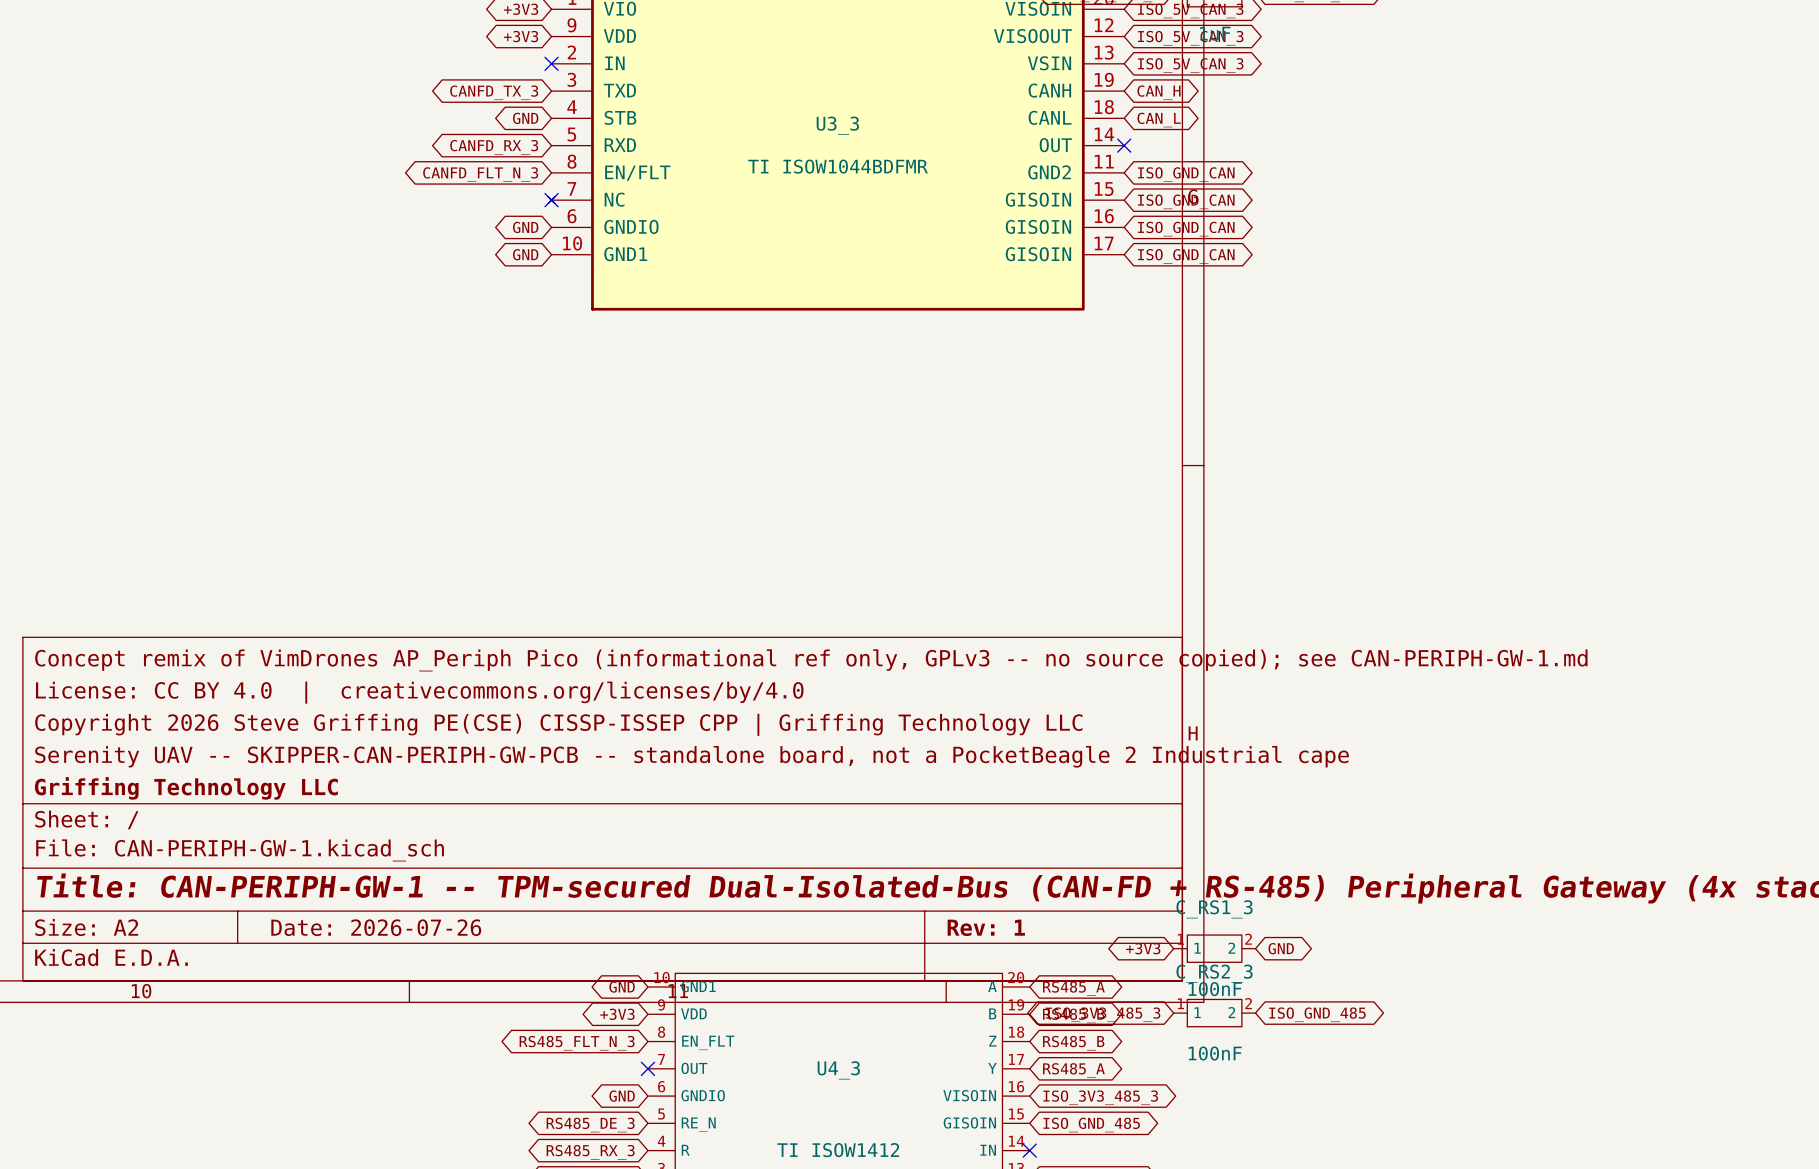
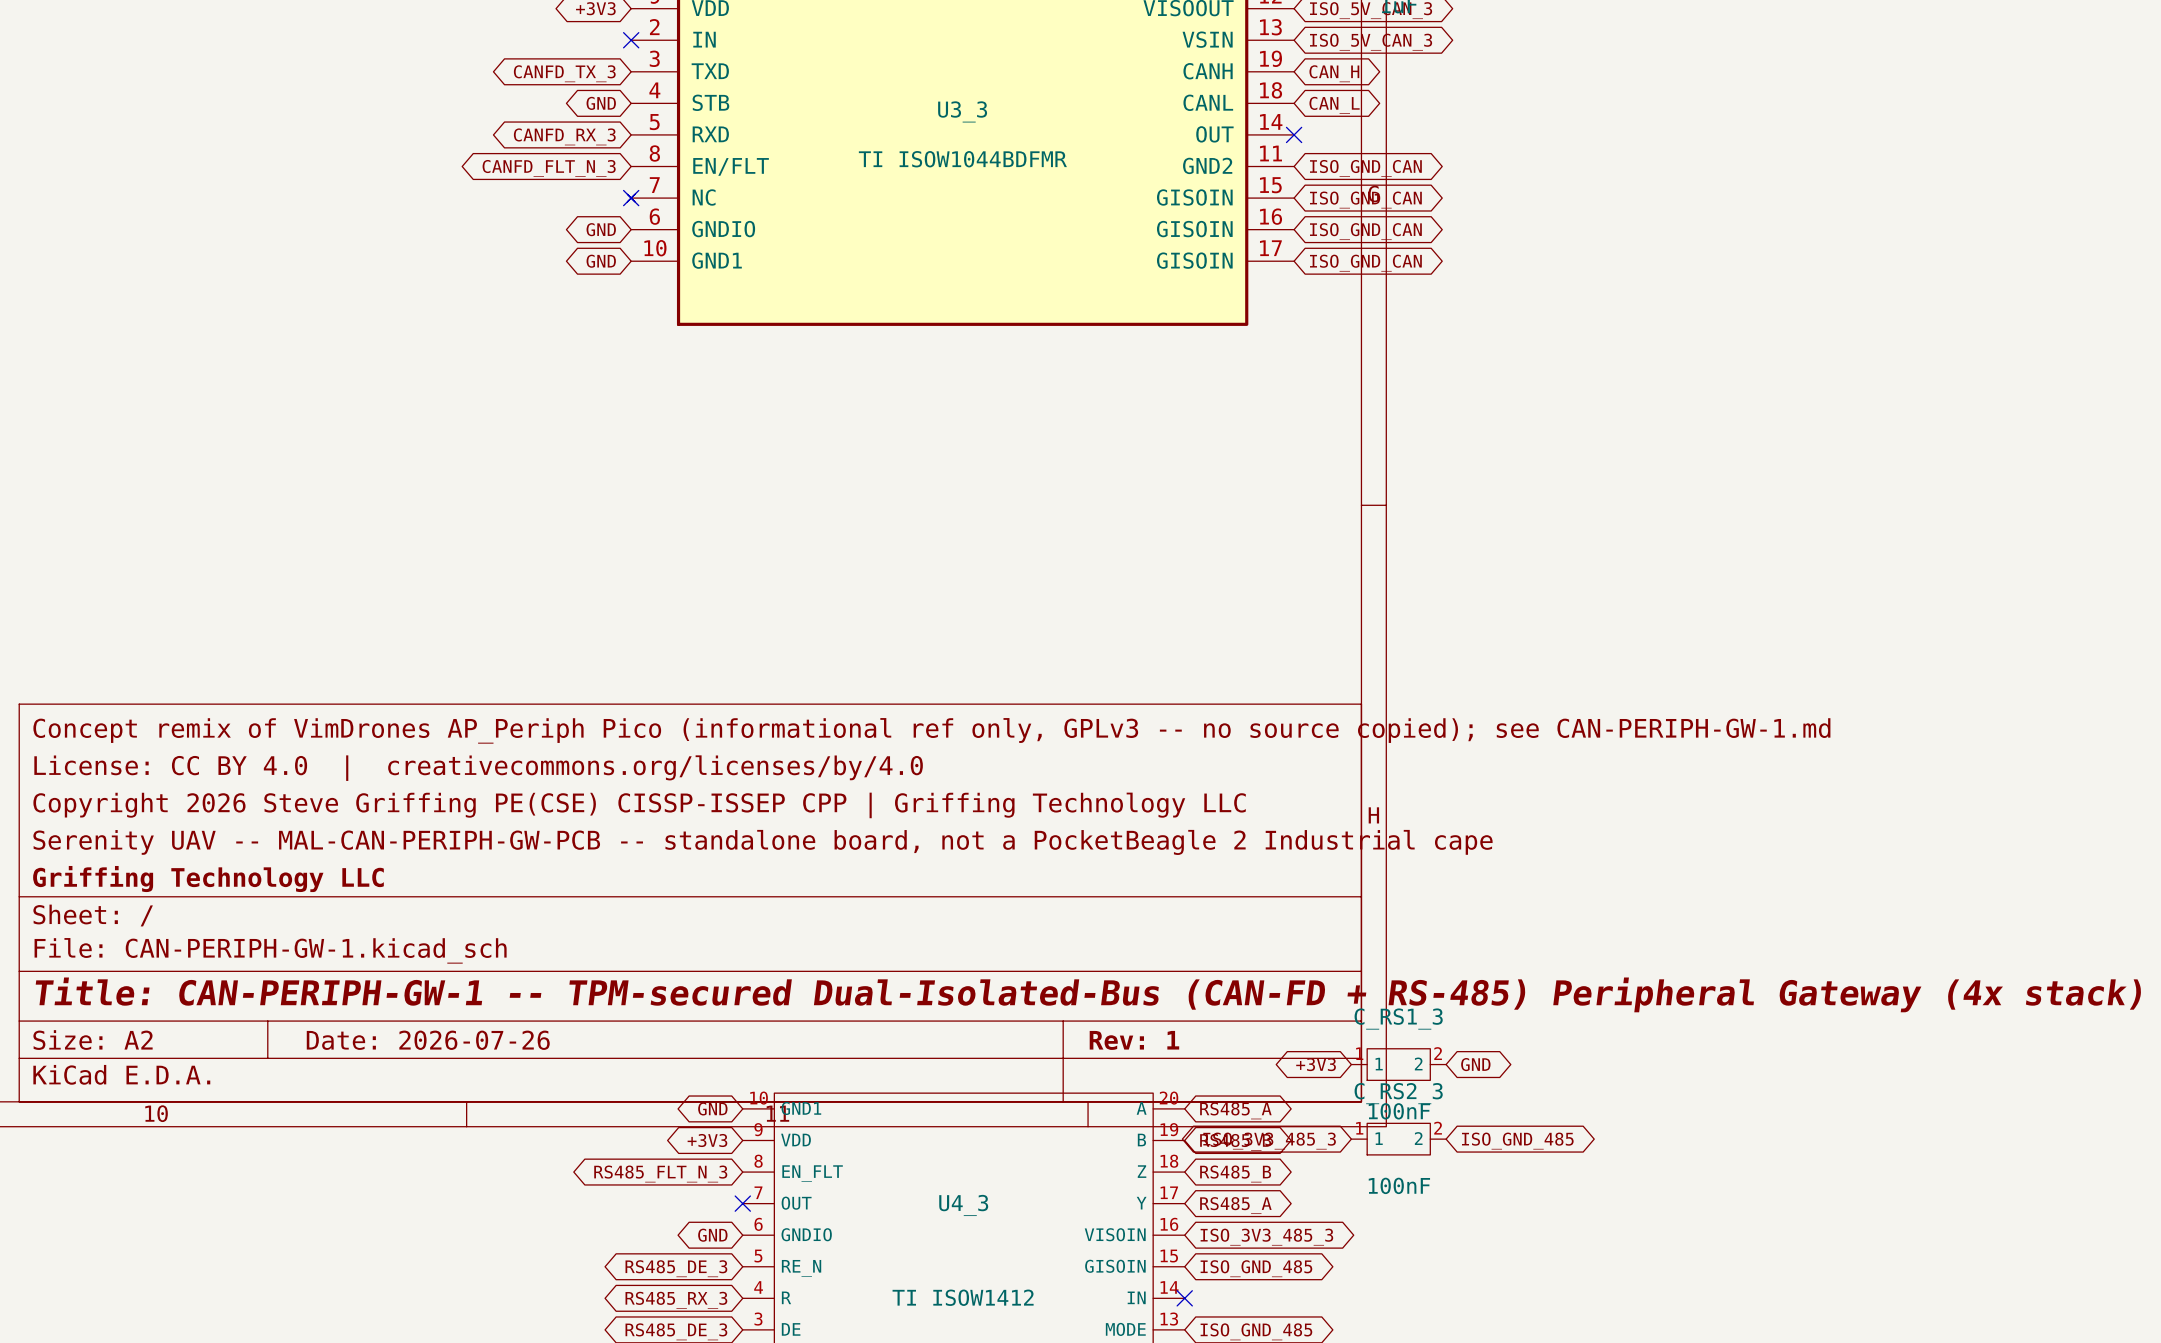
title block: Serenity UAV -- SKIPPER-CAN-PERIPH-GW-PCB -- standalone board, not a PocketBeagle 2 Industrial cape (692, 756) -> Serenity UAV -- MAL-CAN-PERIPH-GW-PCB -- standalone board, not a PocketBeagle 2 Industrial cape (763, 842)

